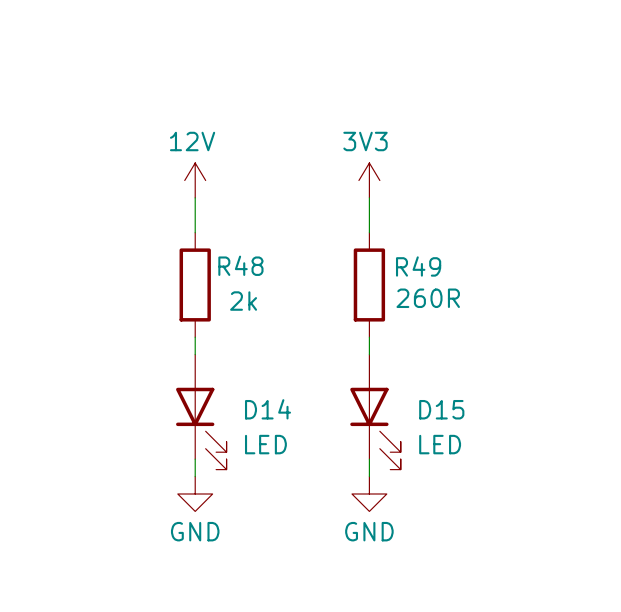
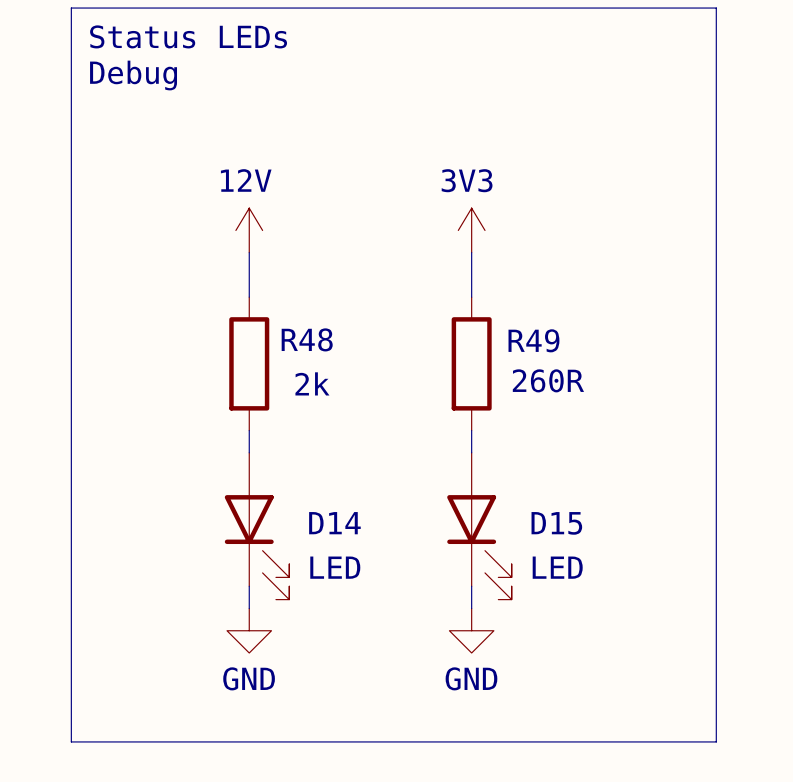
line: none -> (71, 8) (716, 8) (716, 741) (71, 741) (71, 8)
text: none -> Status LEDs (188, 36)
text: none -> Debug (133, 75)

